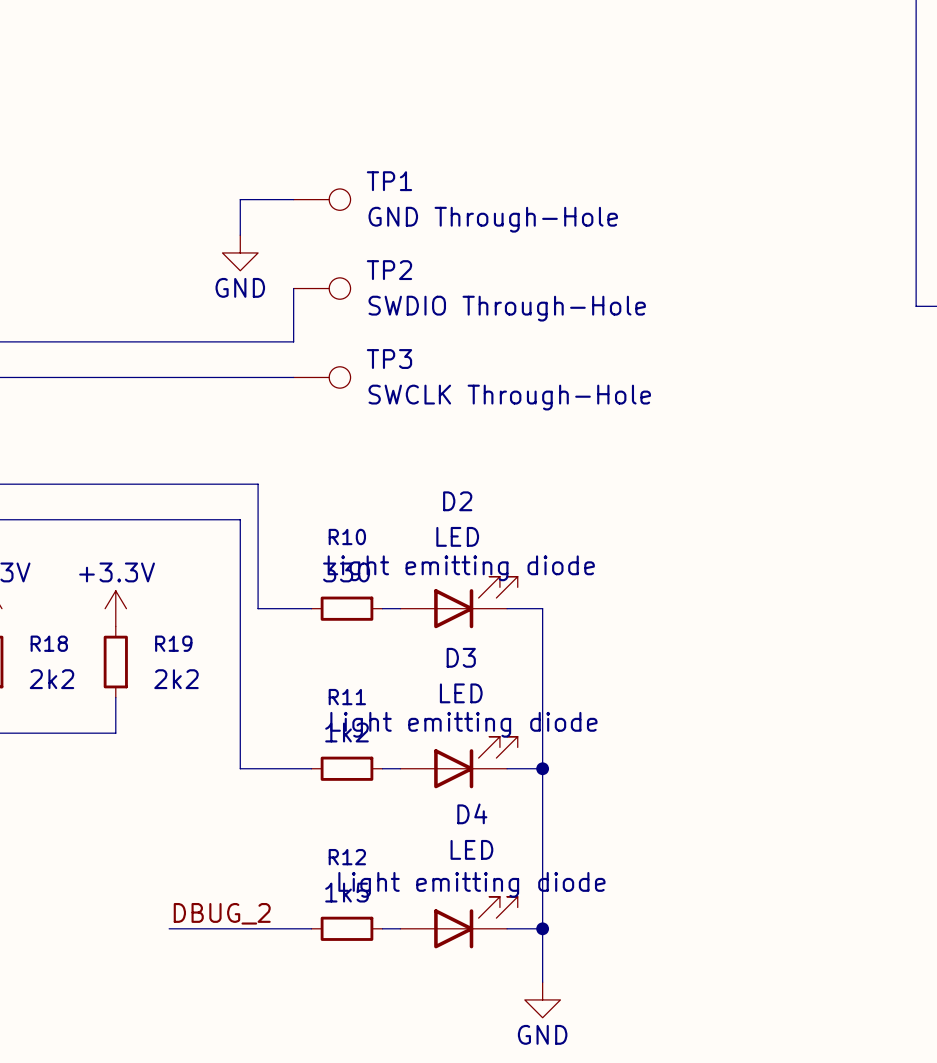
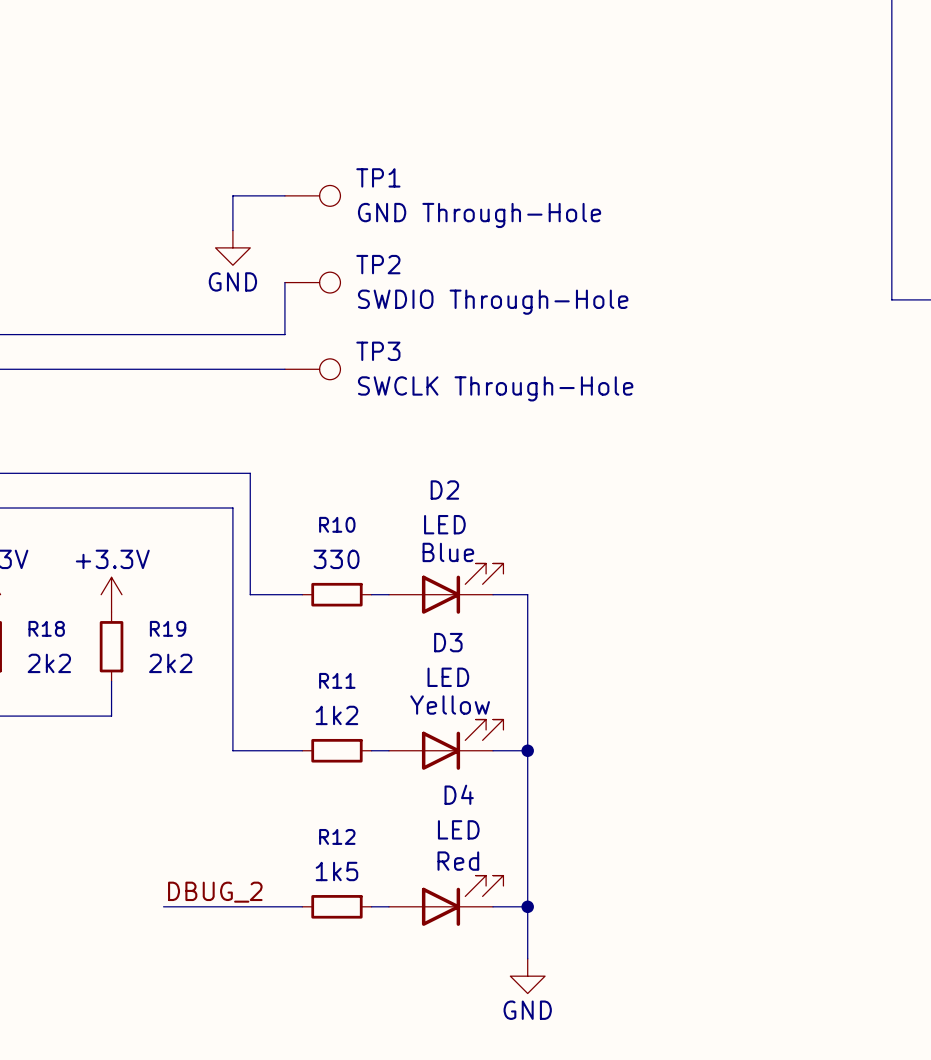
D2 text: Light emitting diode (461, 568) -> Blue (448, 552)
D3 text: Light emitting diode (463, 724) -> Yellow (450, 705)
D4 text: Light emitting diode (471, 884) -> Red (458, 861)

